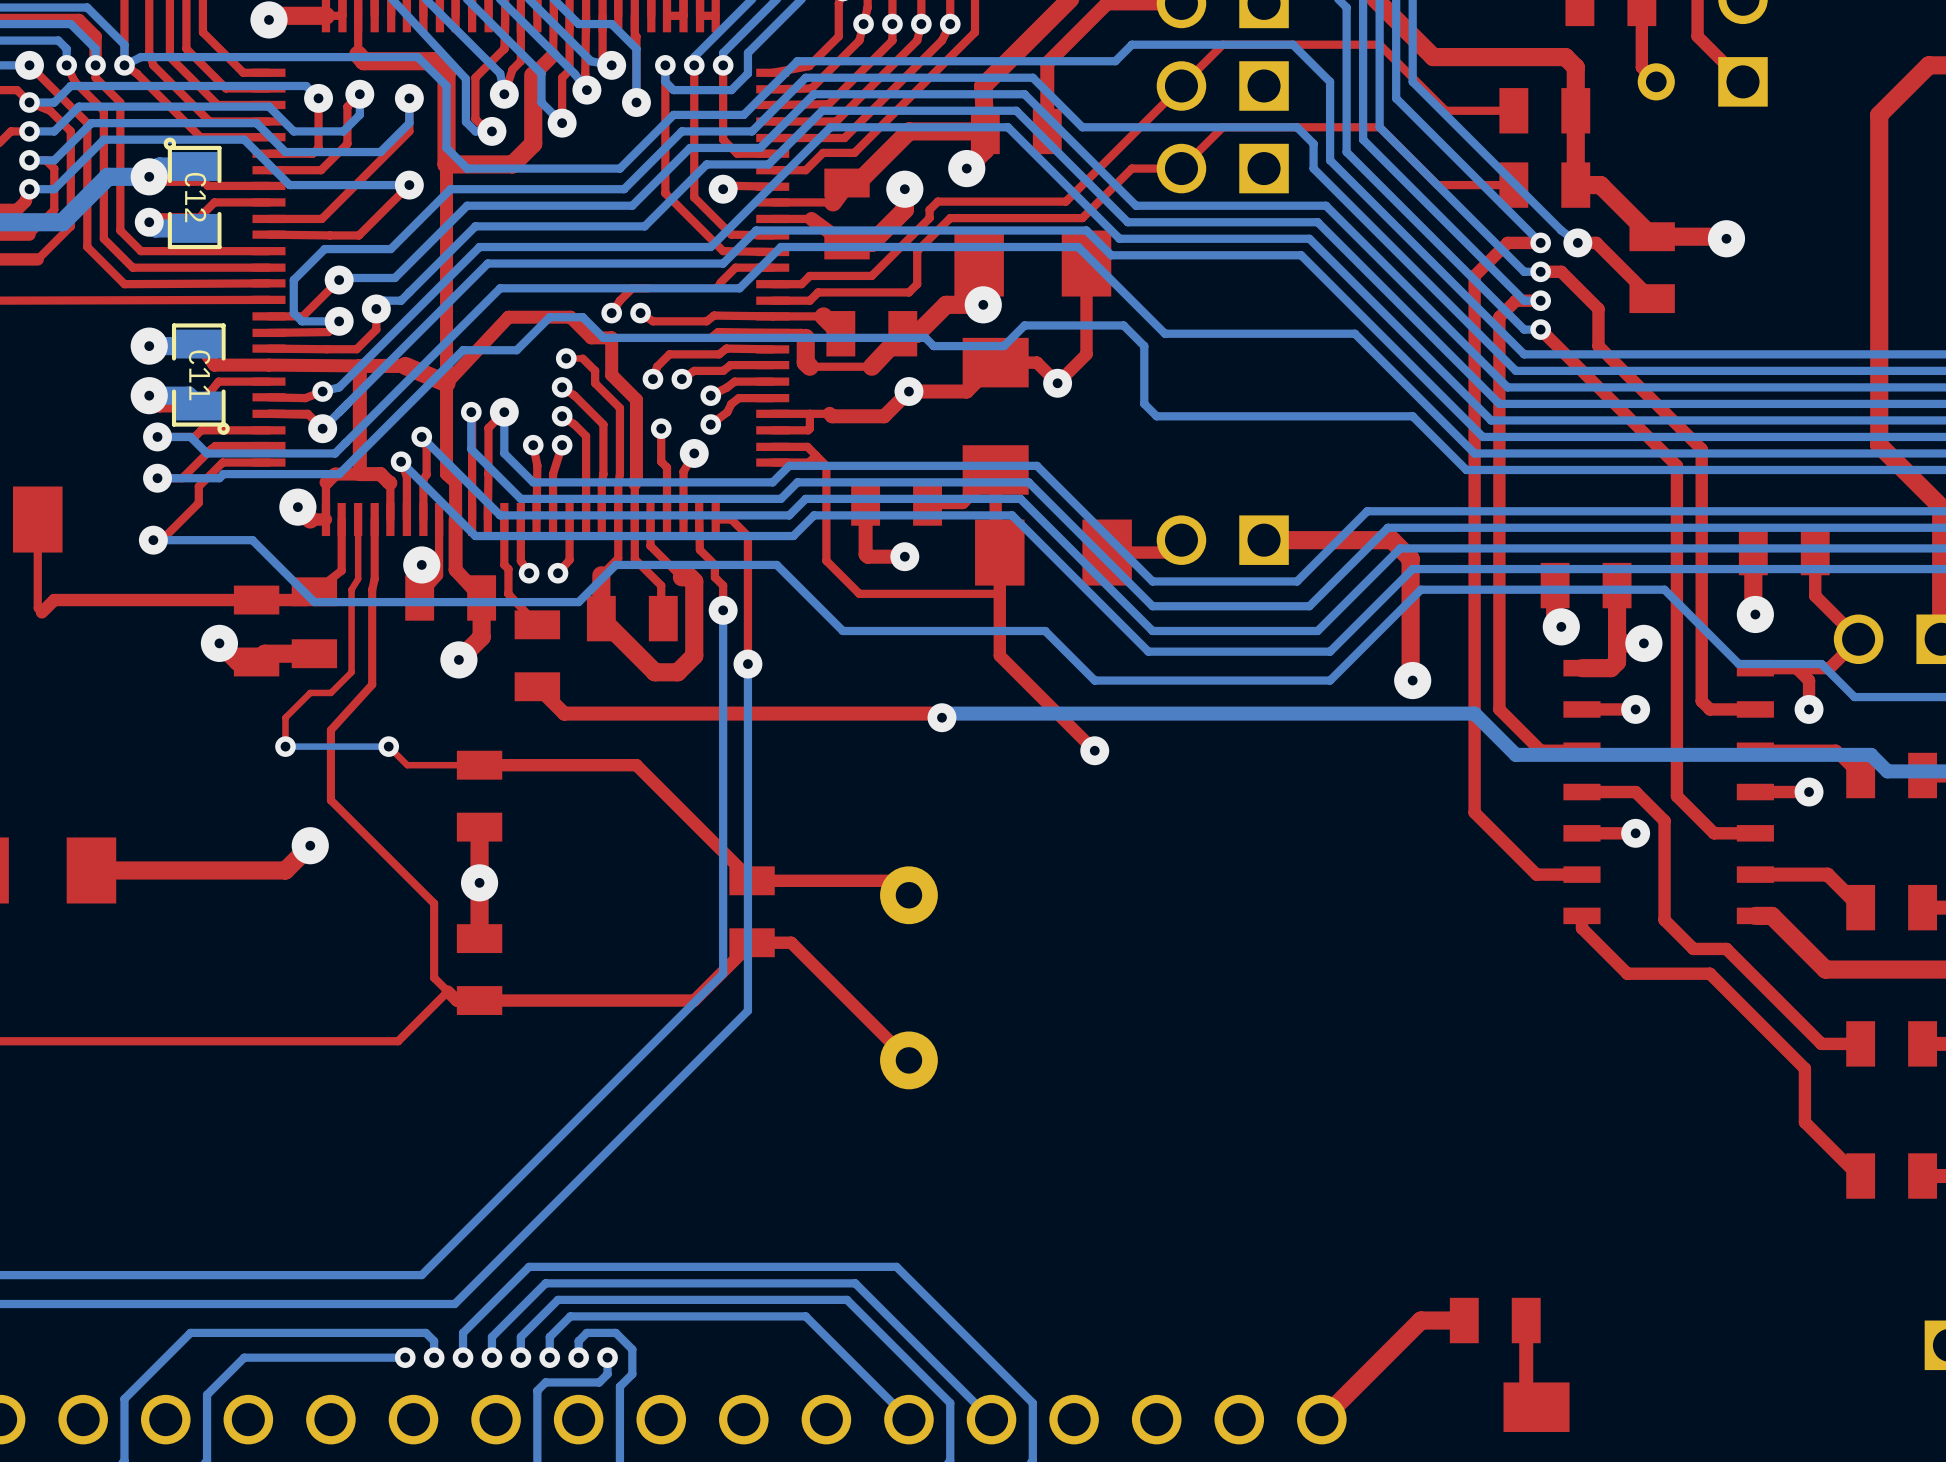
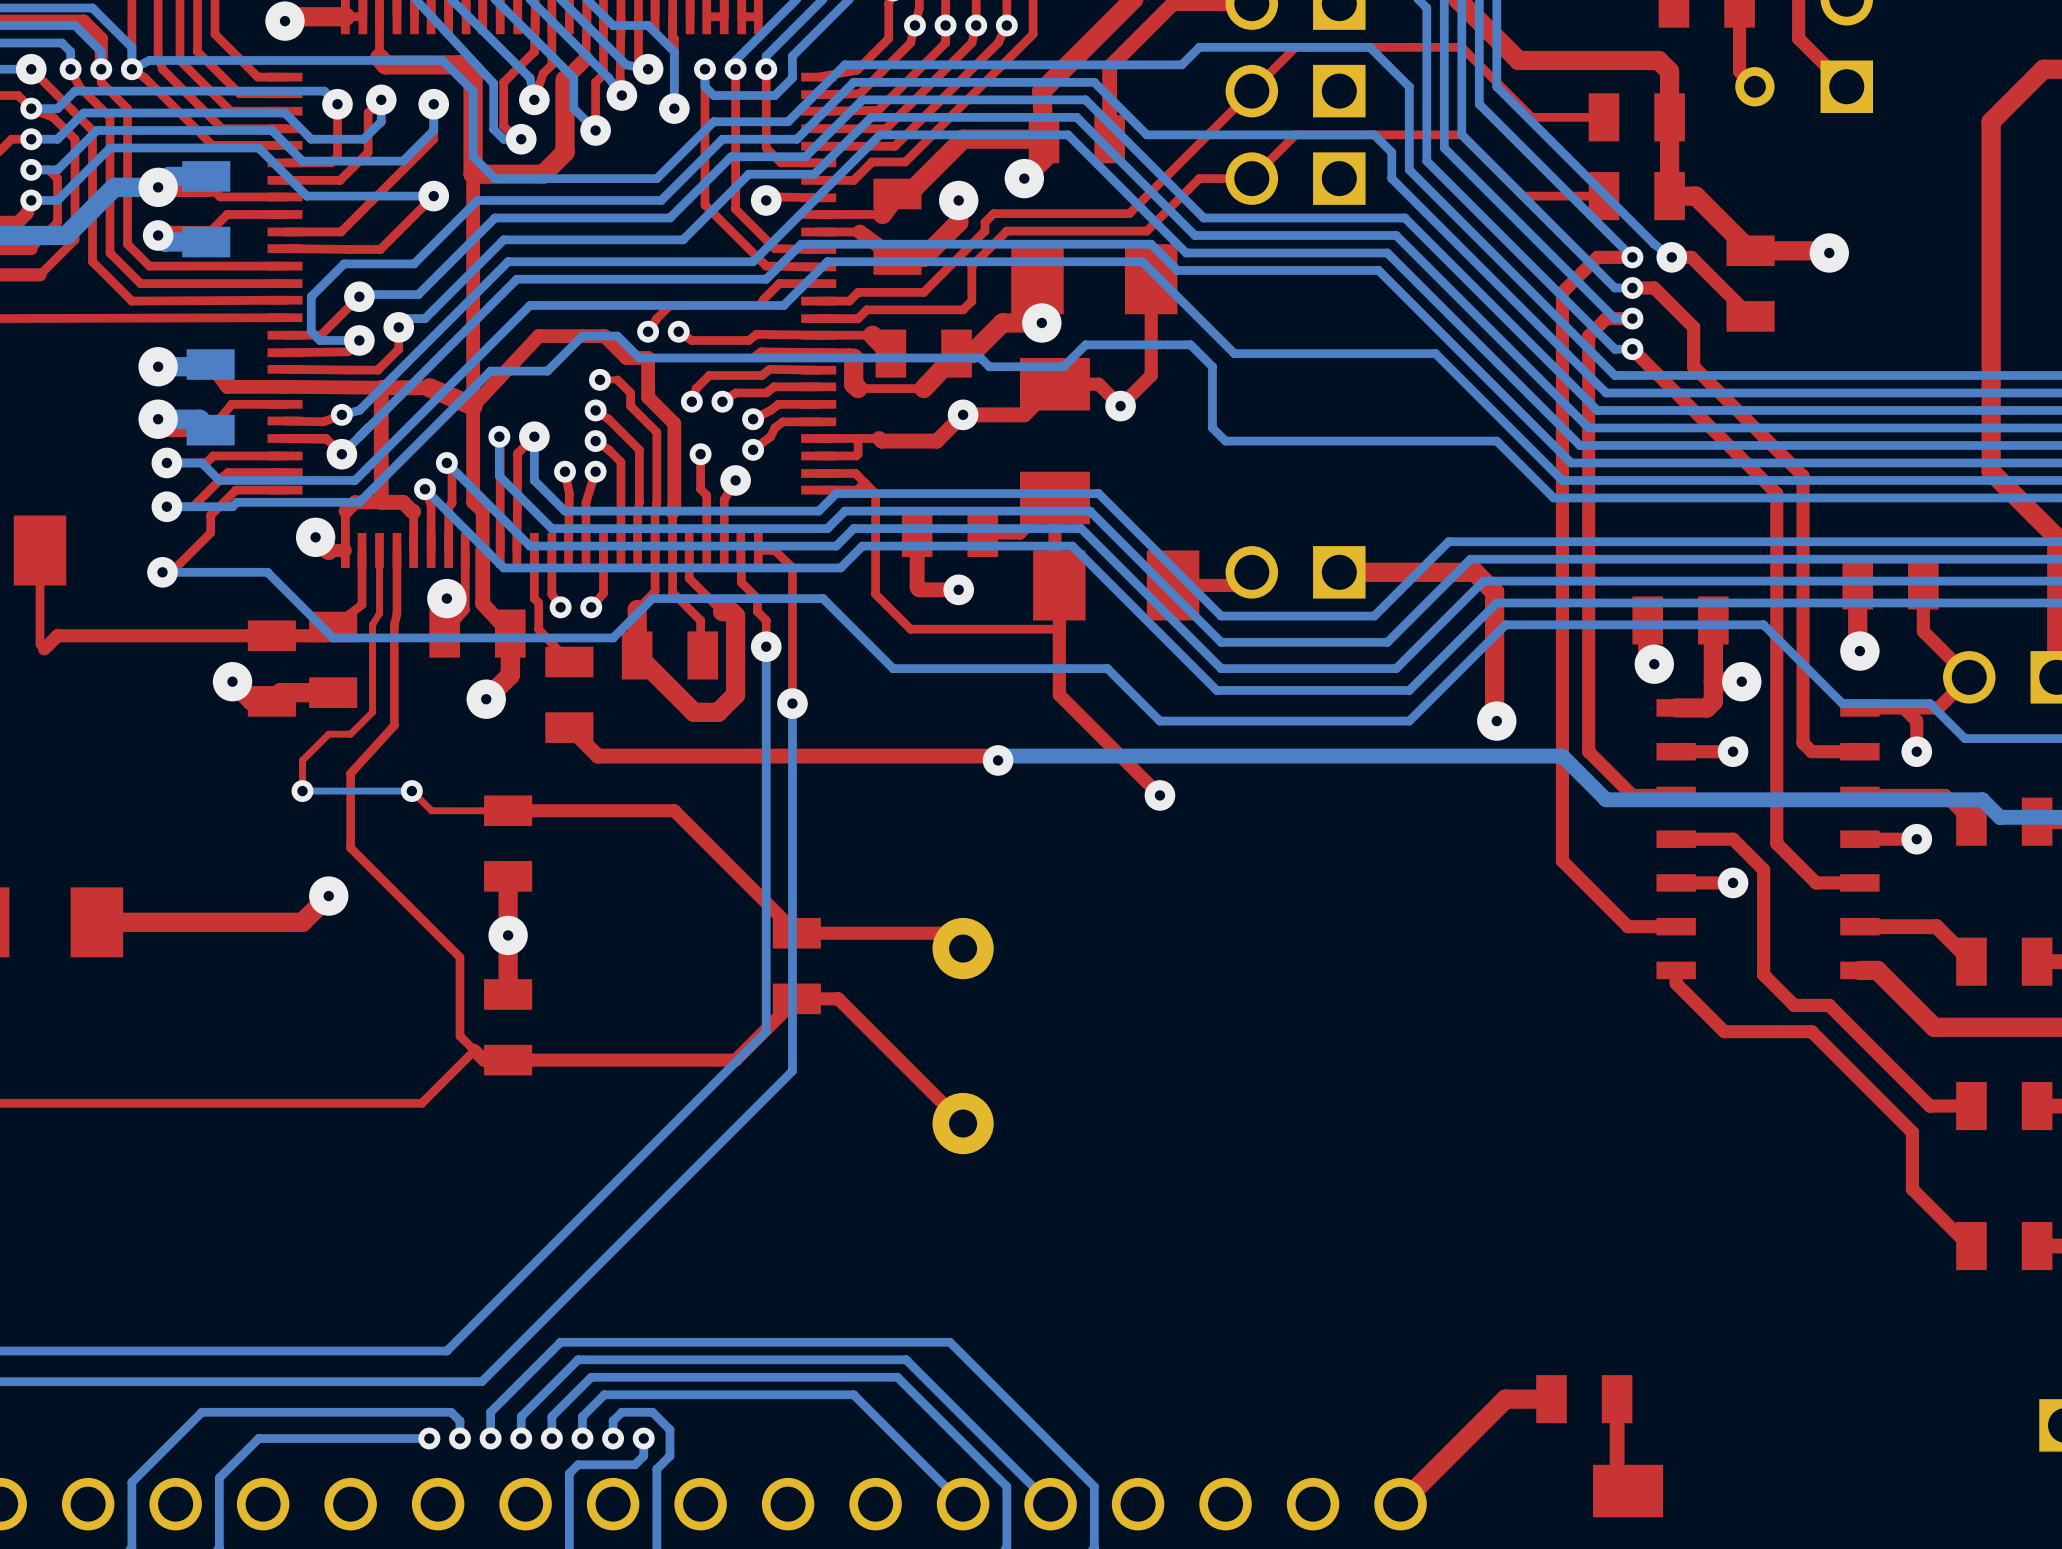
C12: (192, 193) -> none
part: none -> (206, 209)
part: none -> (210, 397)
C11: (200, 379) -> none

